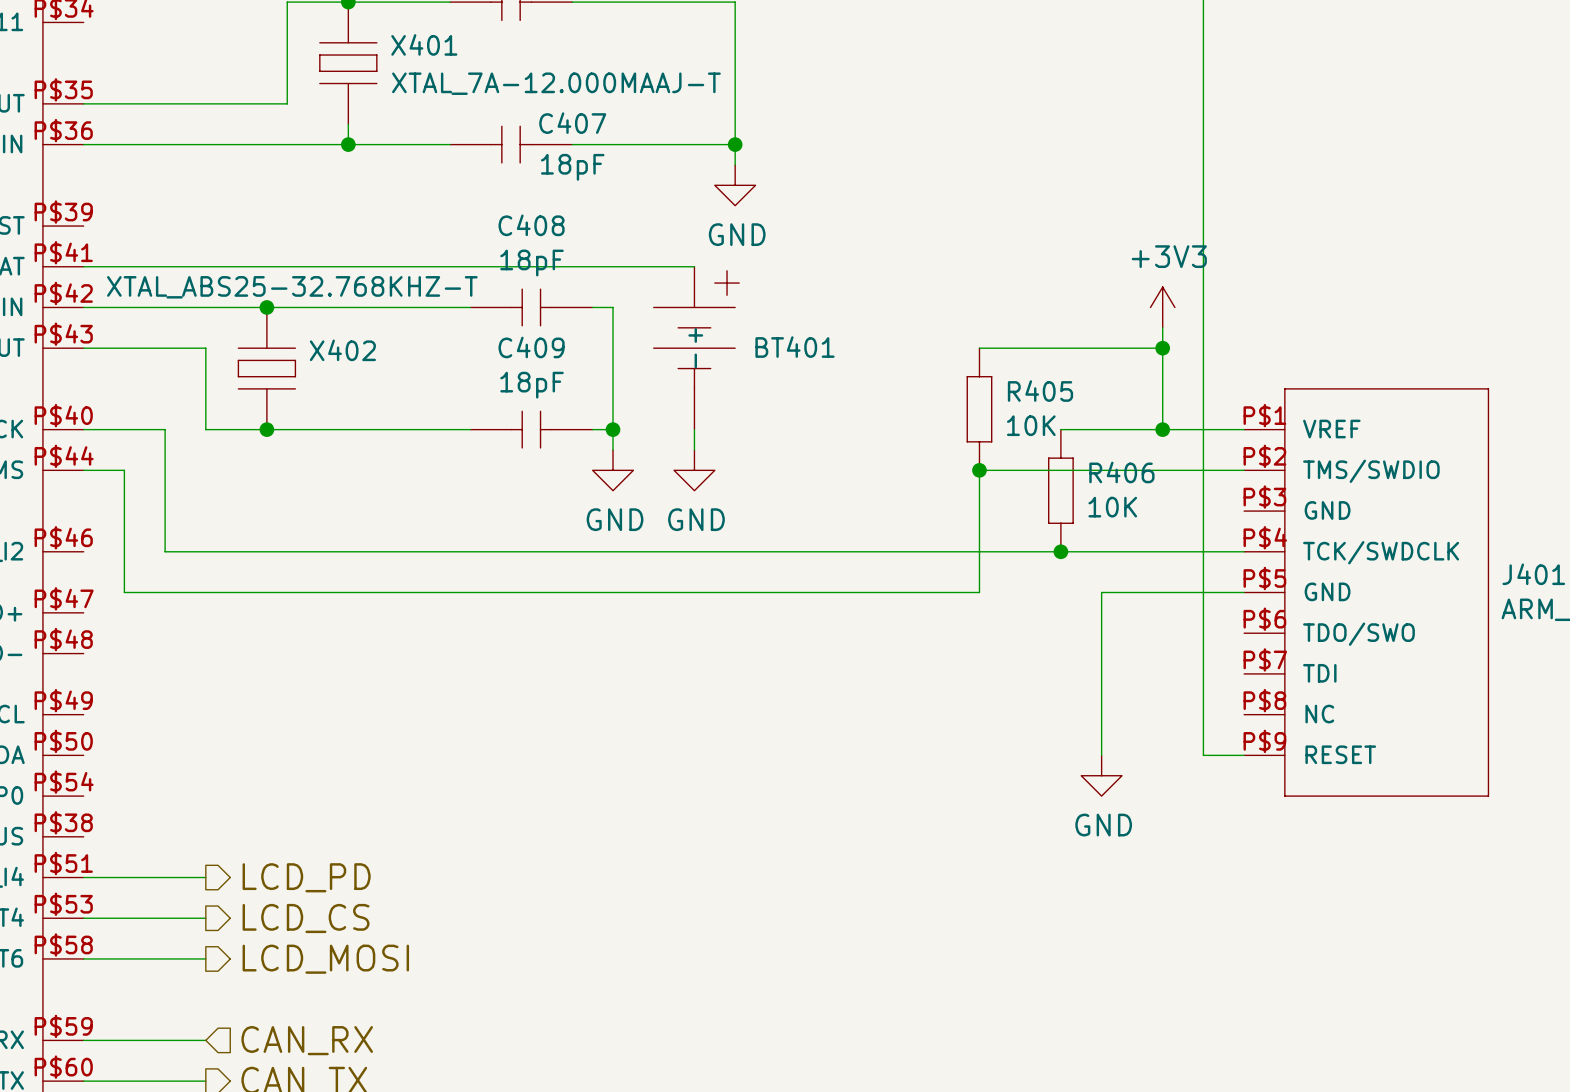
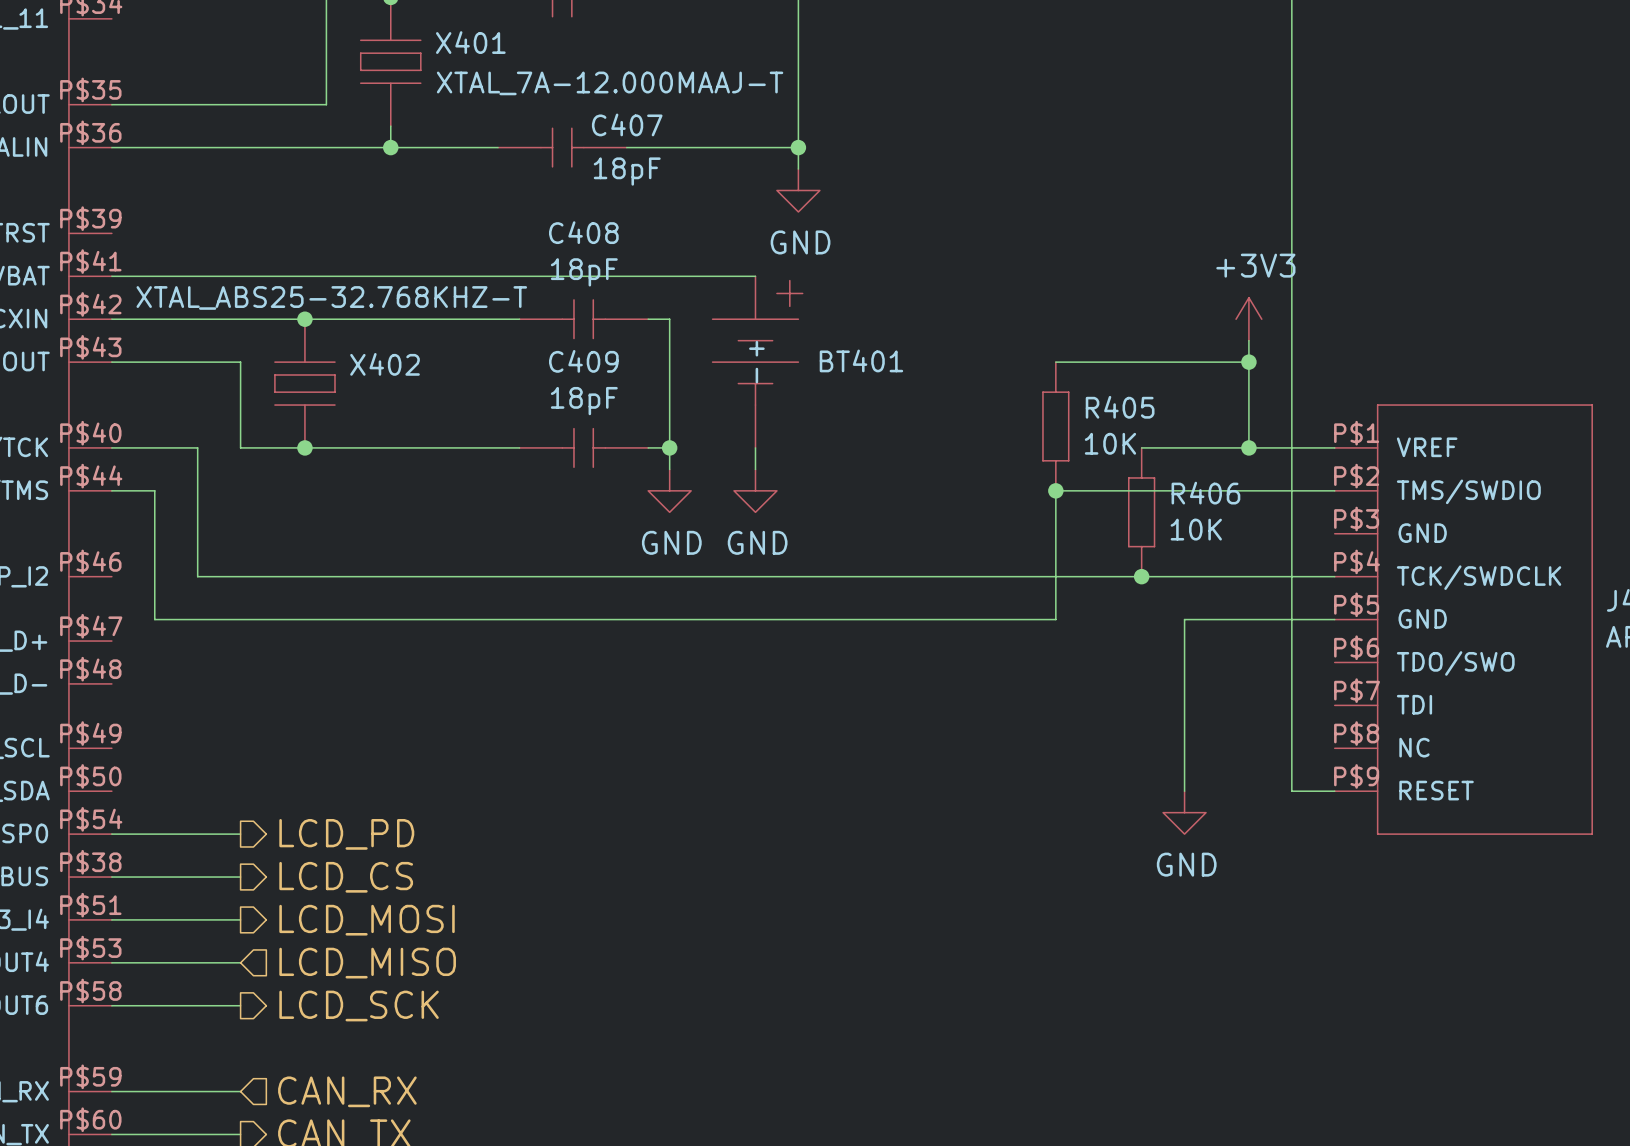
wire: none -> (111, 834) (240, 834)
hierarchical label: none -> LCD_PD (346, 834)
wire: none -> (111, 877) (240, 877)
hierarchical label: none -> LCD_CS (346, 877)
hierarchical label: LCD_PD (306, 877) -> LCD_MOSI (367, 920)
hierarchical label shape: output (306, 918) -> input (367, 963)
hierarchical label: LCD_CS (306, 918) -> LCD_MISO (367, 963)
hierarchical label: LCD_MOSI (325, 959) -> LCD_SCK (359, 1006)

